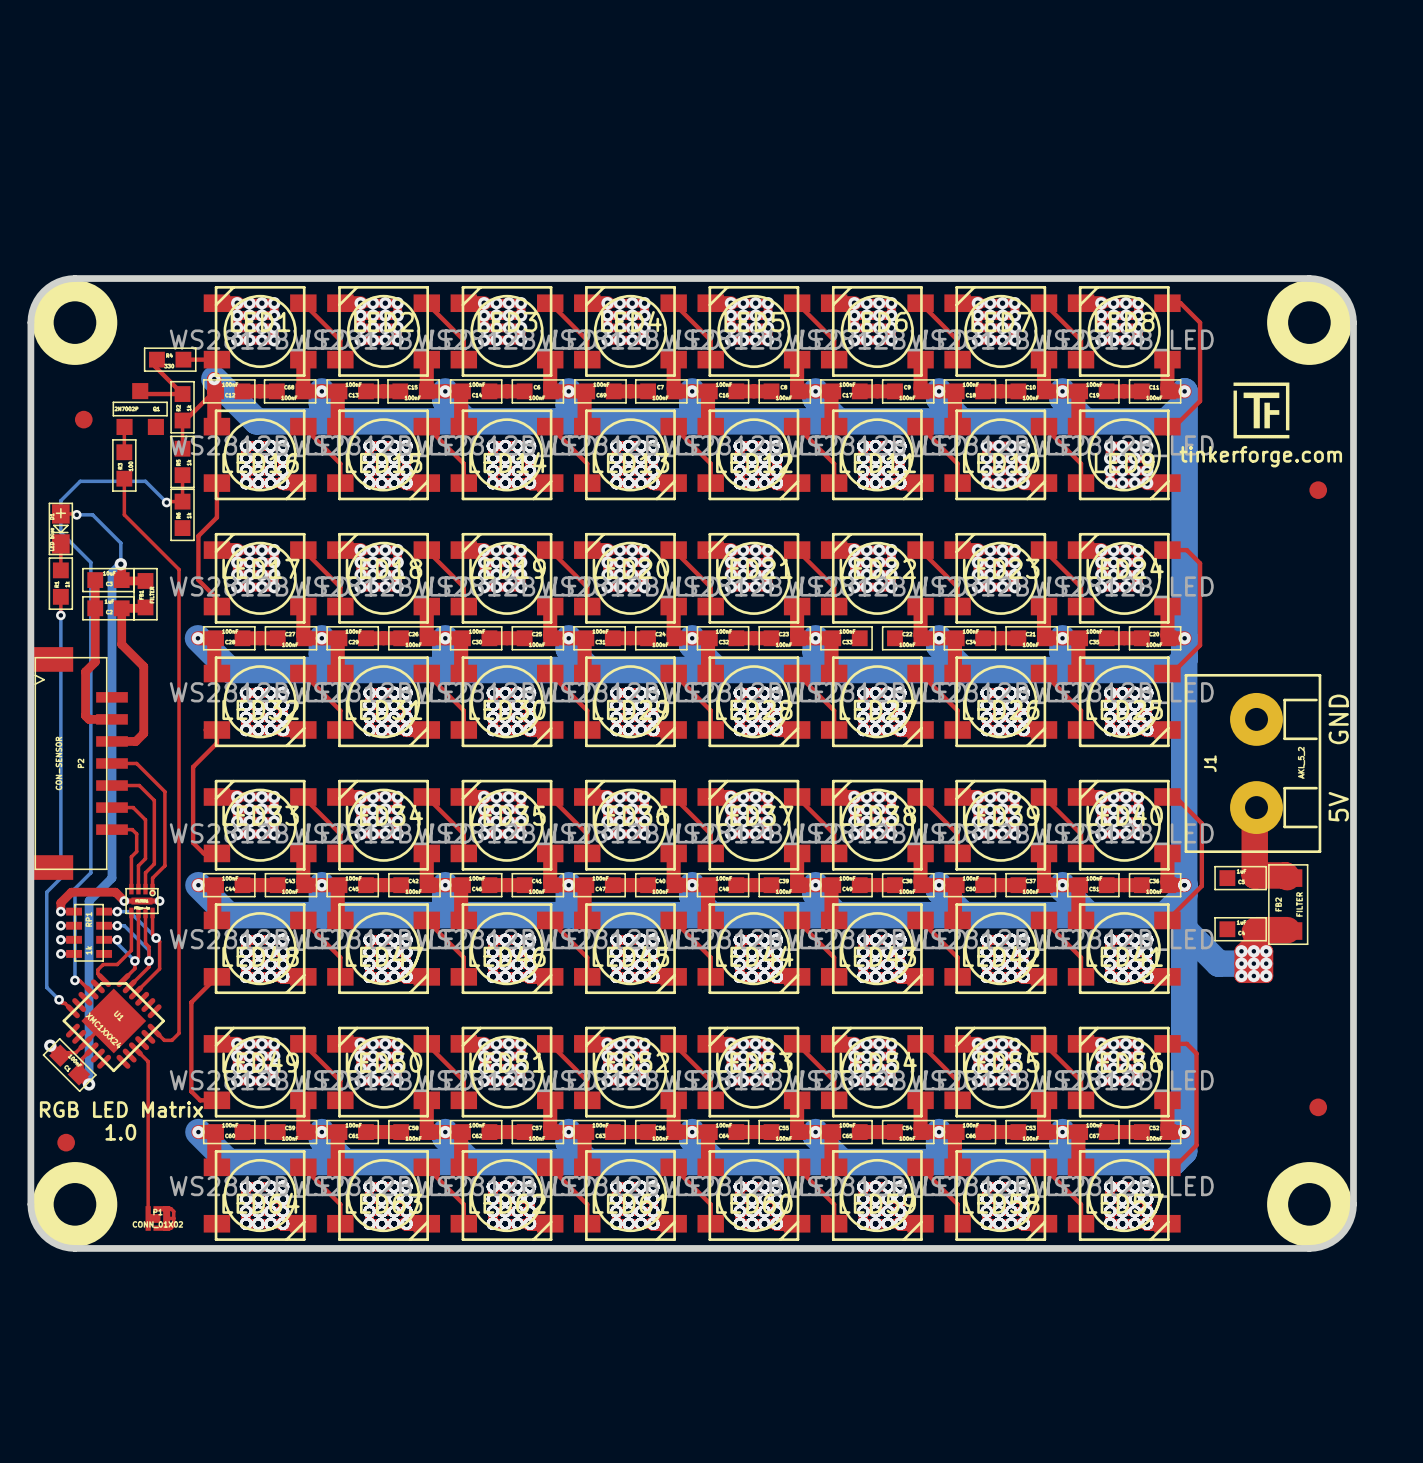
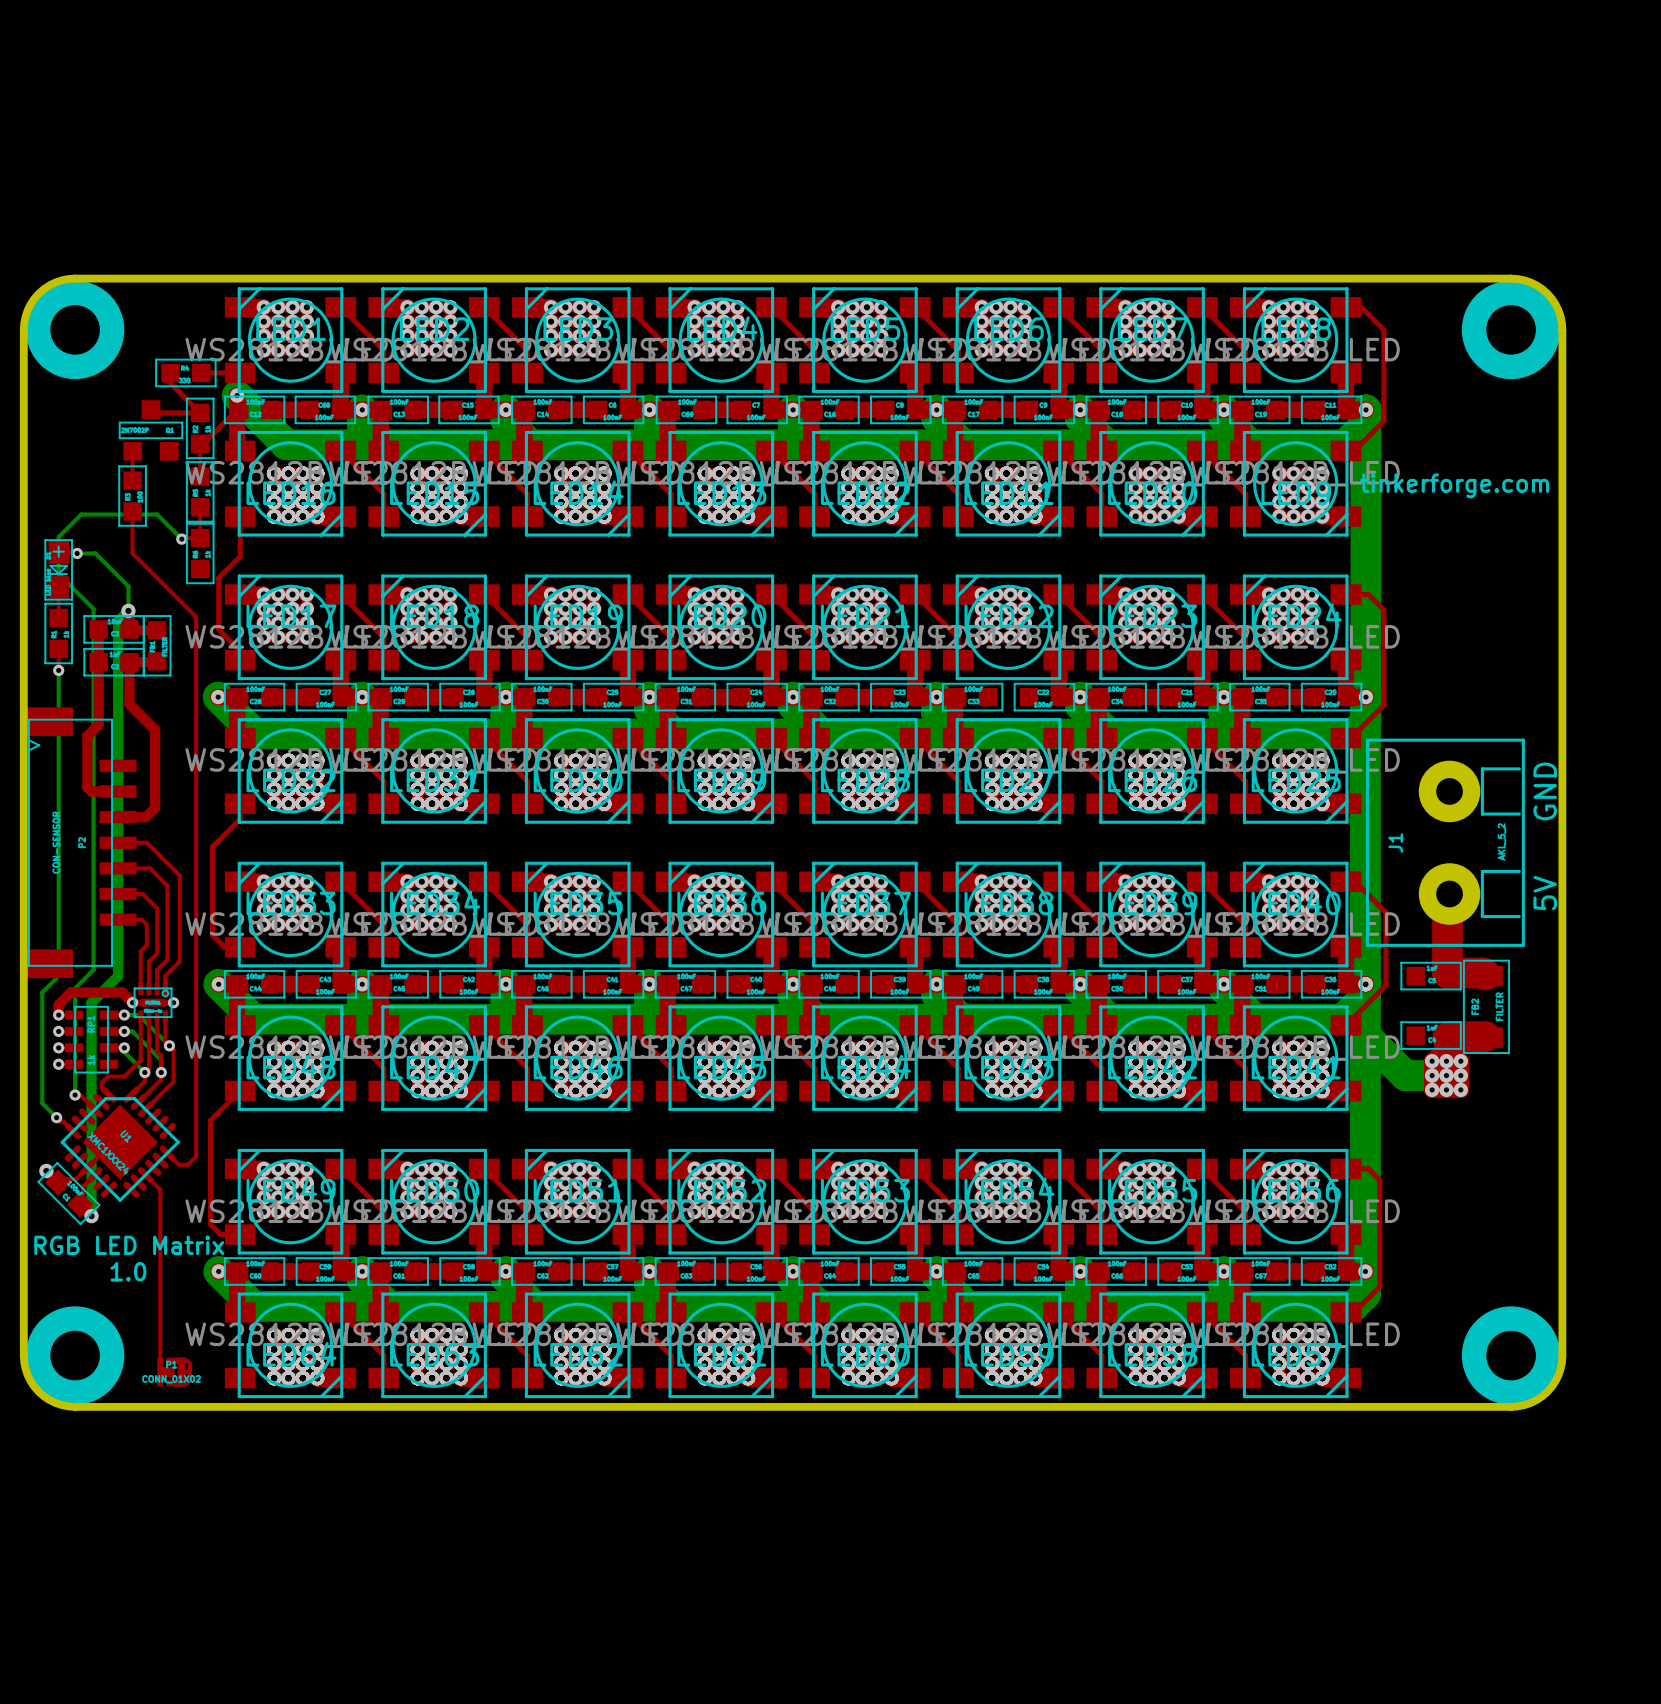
drawing: [1233, 382, 1290, 439] -> none
part: (83, 419) -> none
part: (1318, 490) -> none
part: (1318, 1107) -> none
part: (66, 1142) -> none

